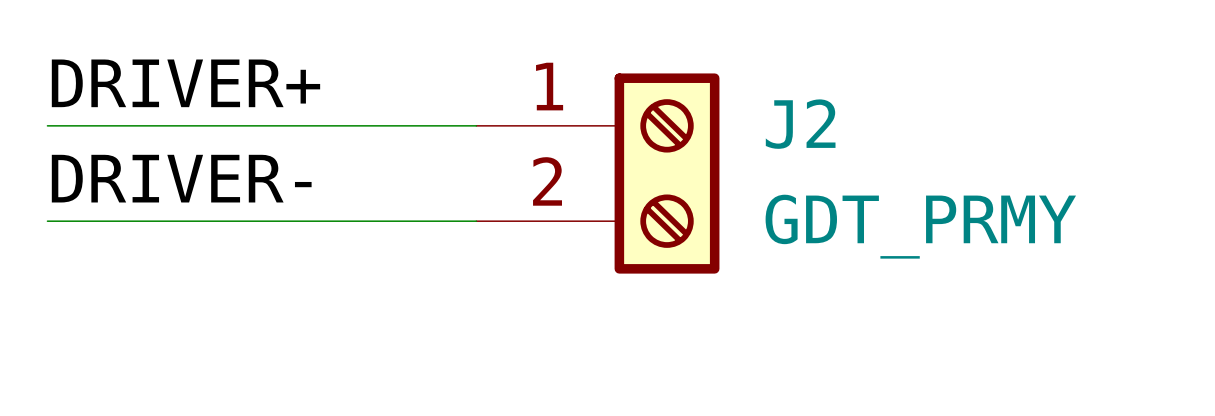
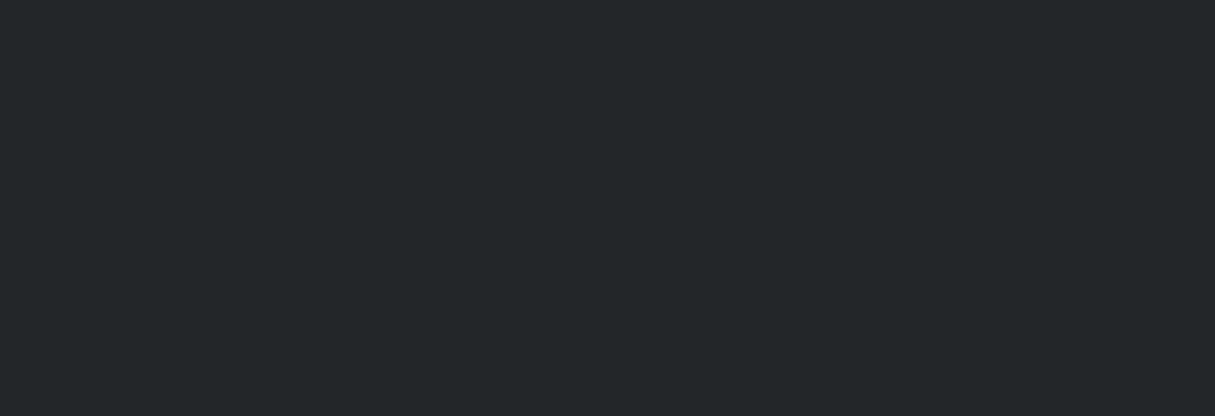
label: DRIVER+ (185, 83) -> none
wire: (47, 125) (476, 125) -> none
J2: GDT_PRMY (597, 173) -> none
label: DRIVER- (181, 178) -> none
wire: (47, 221) (476, 221) -> none

